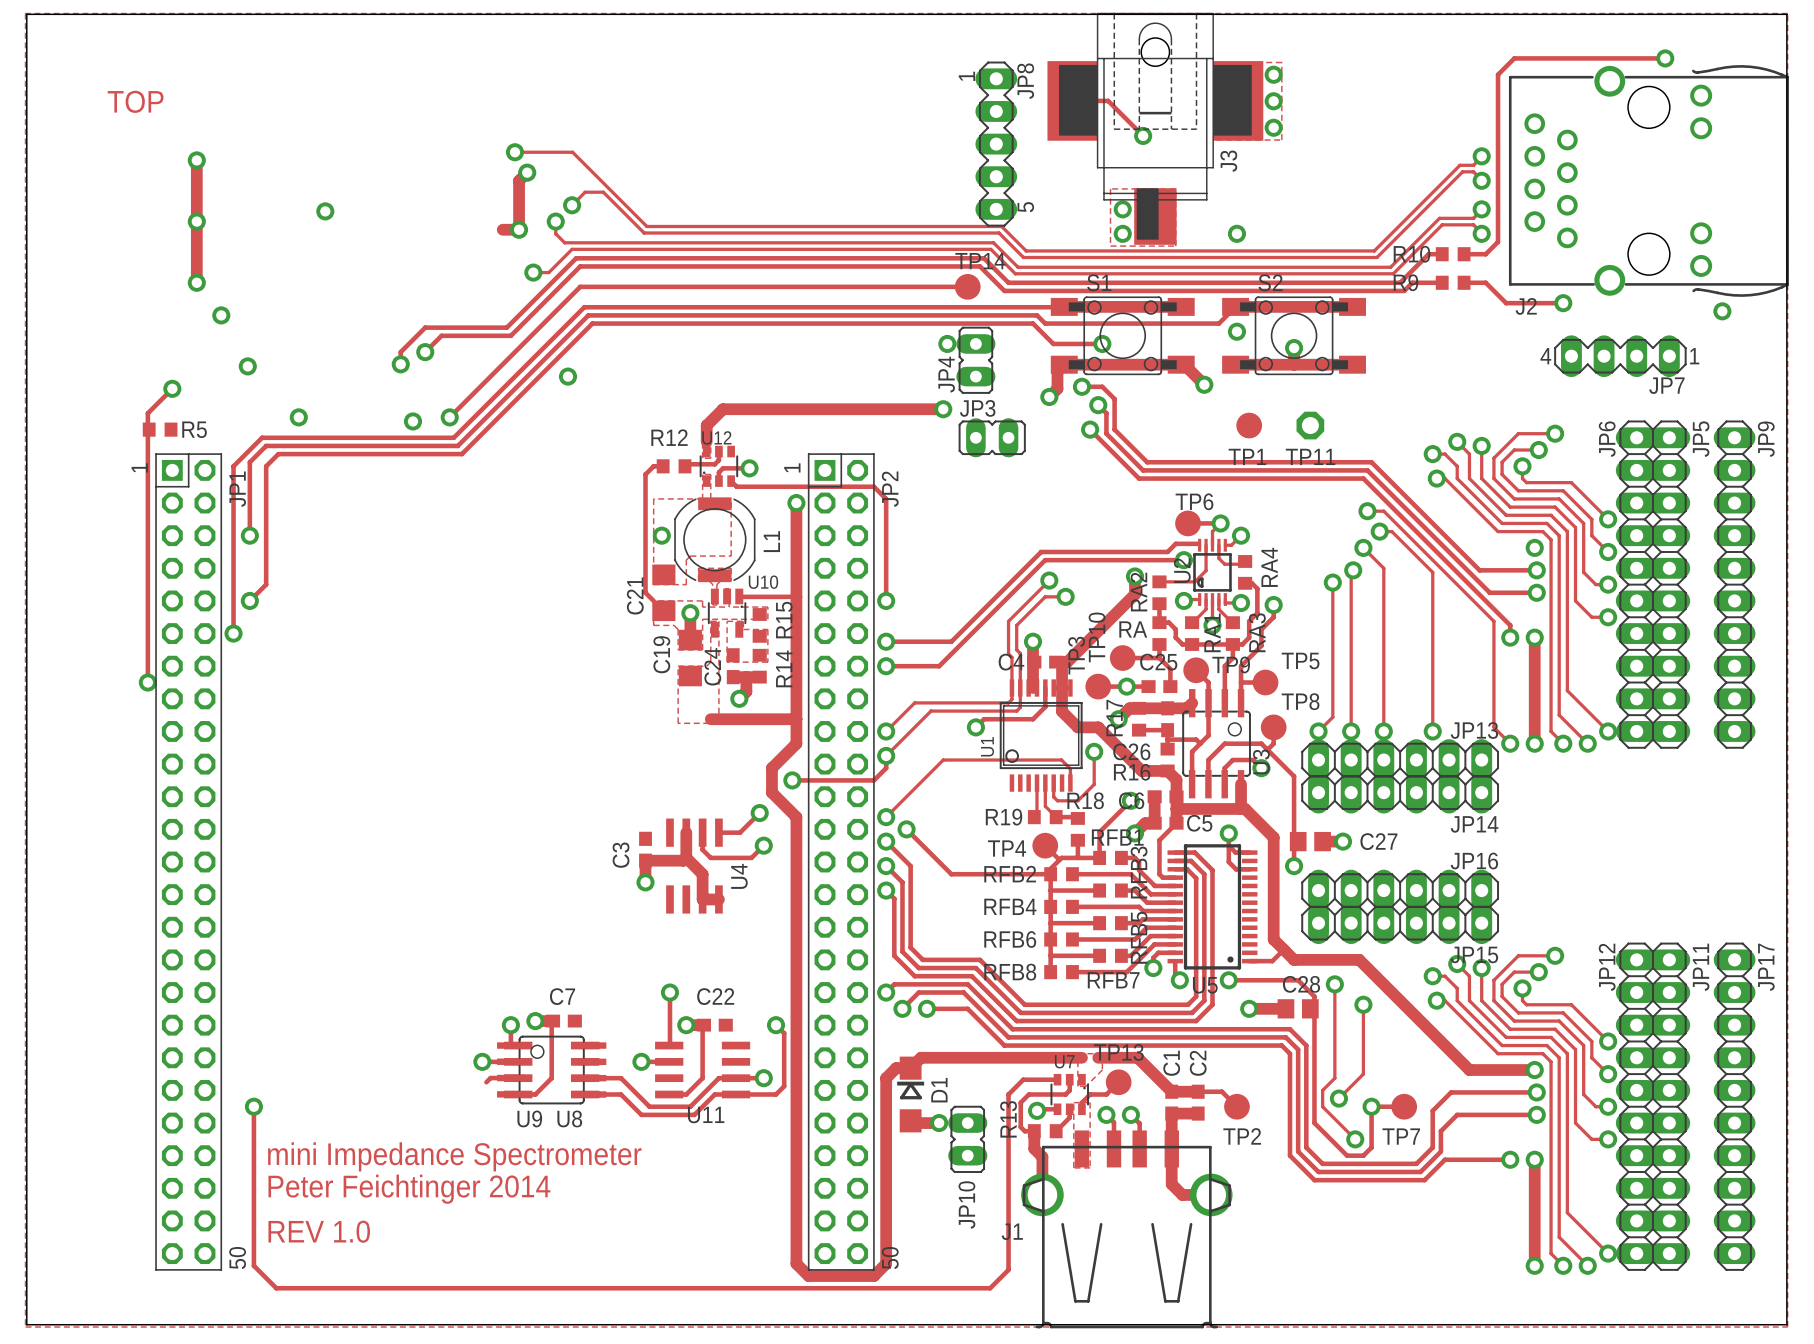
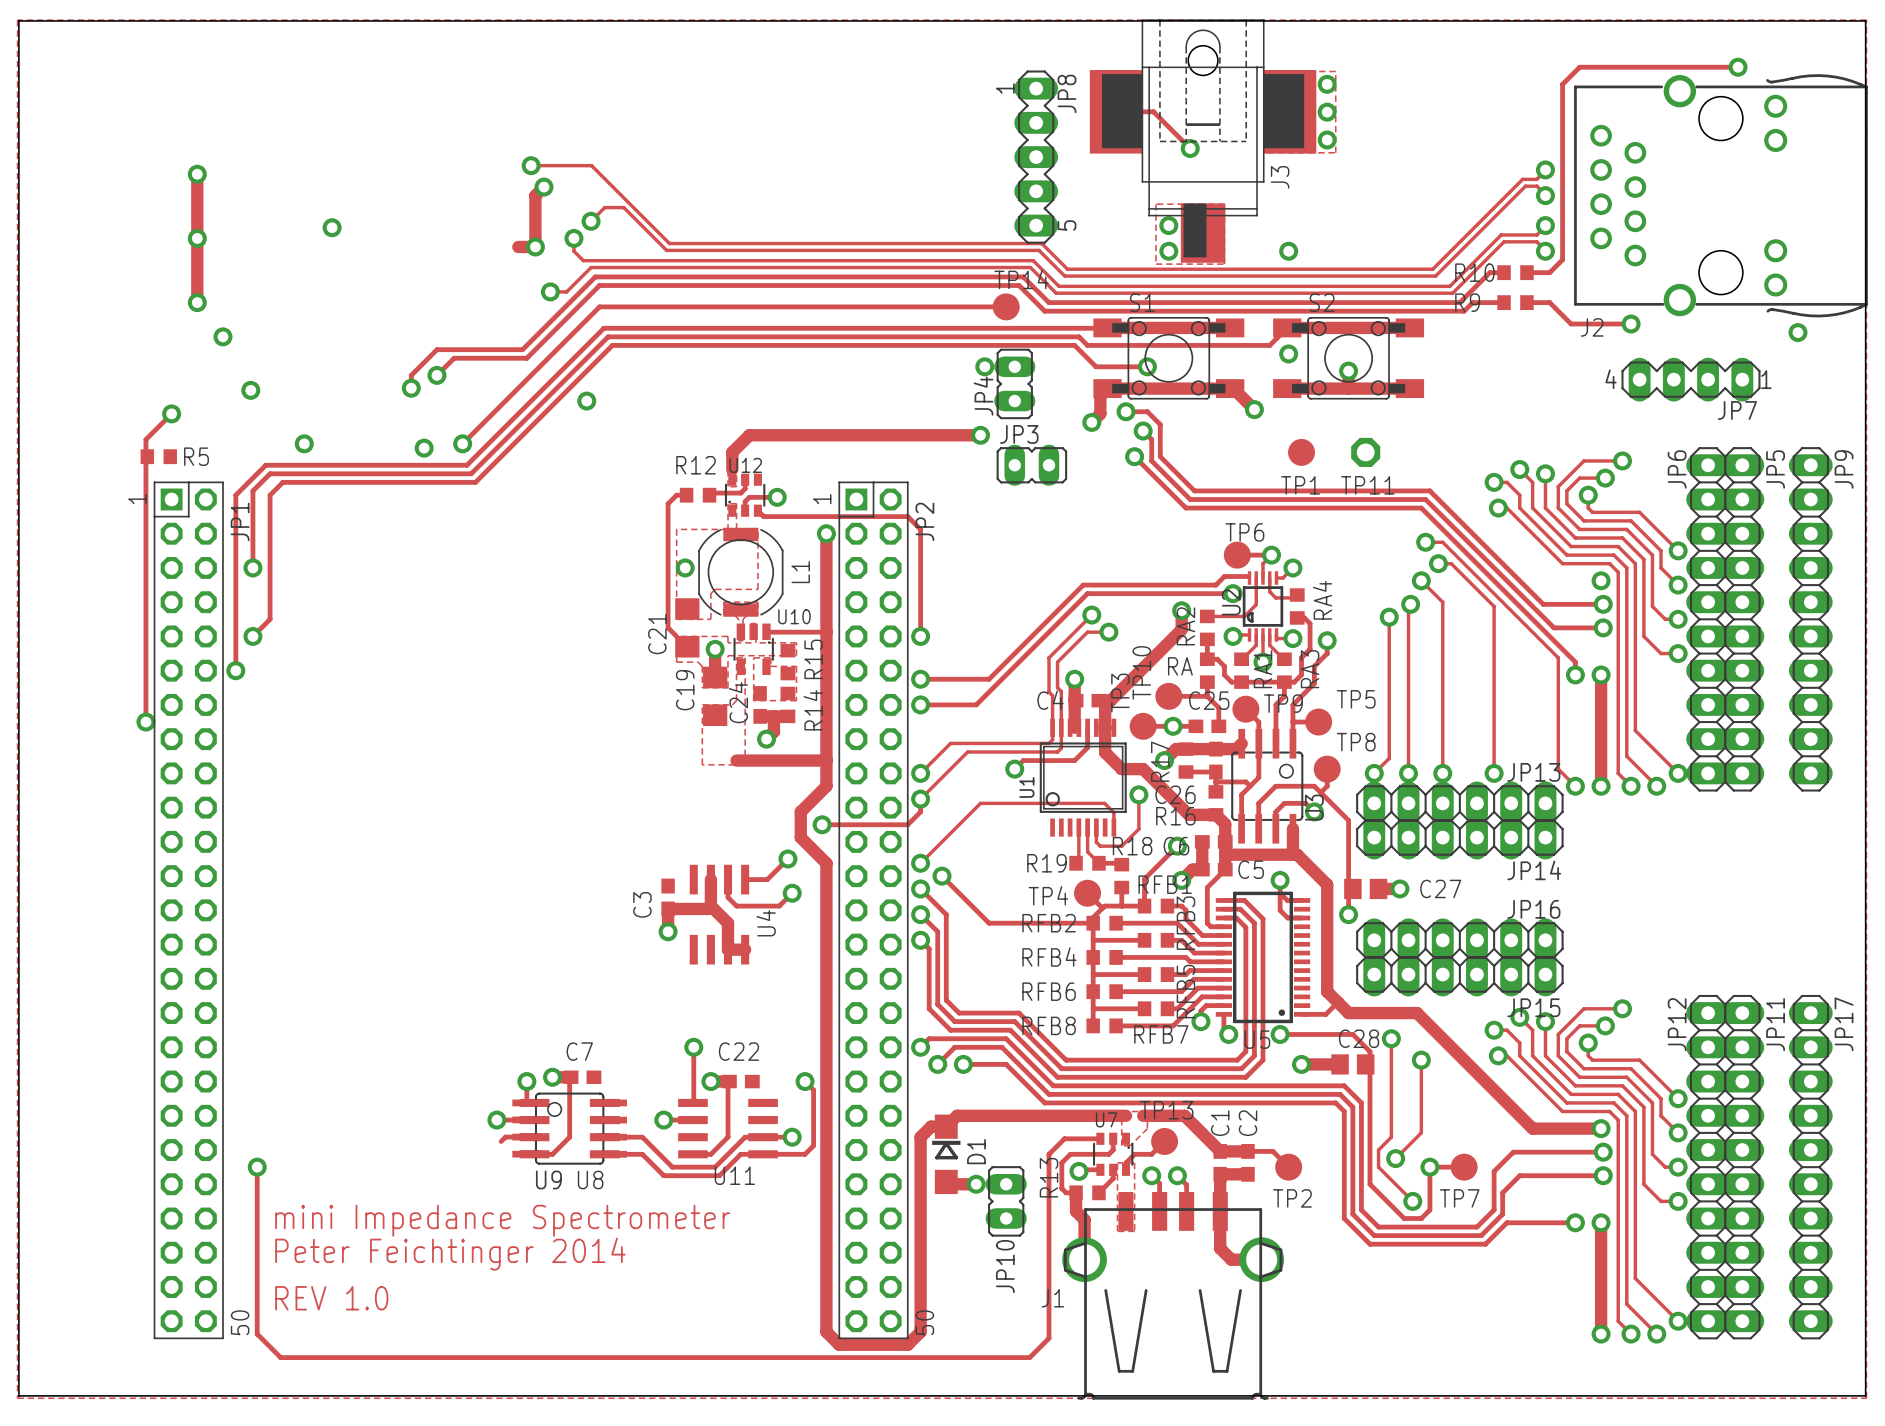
text: TOP (135, 101) -> none

